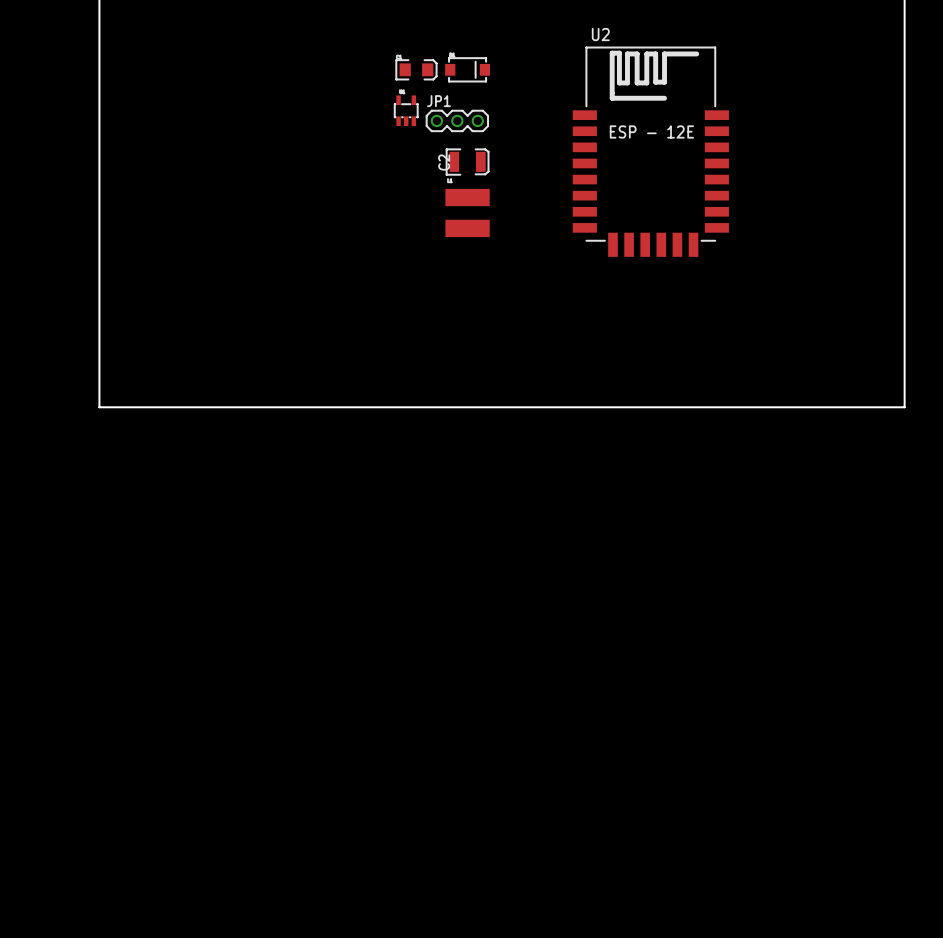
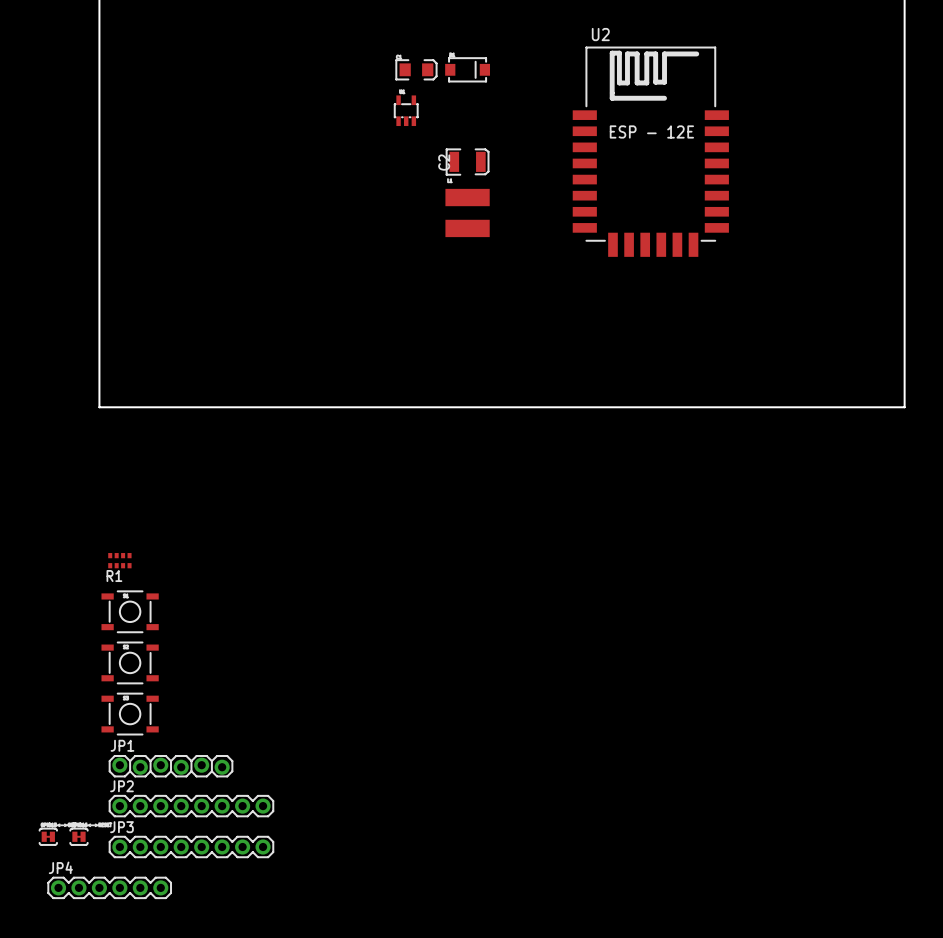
JP1 name position: JP1 (438, 101) -> JP1 (122, 745)
JP1 footprint: [425, 109, 489, 132] -> [108, 755, 234, 778]
R1: none -> (119, 560)
part: none -> (130, 611)
part: none -> (130, 662)
part: none -> (130, 714)
JP2: none -> (191, 806)
part: none -> (48, 836)
part: none -> (78, 836)
JP3: none -> (191, 847)
JP4: none -> (109, 887)

